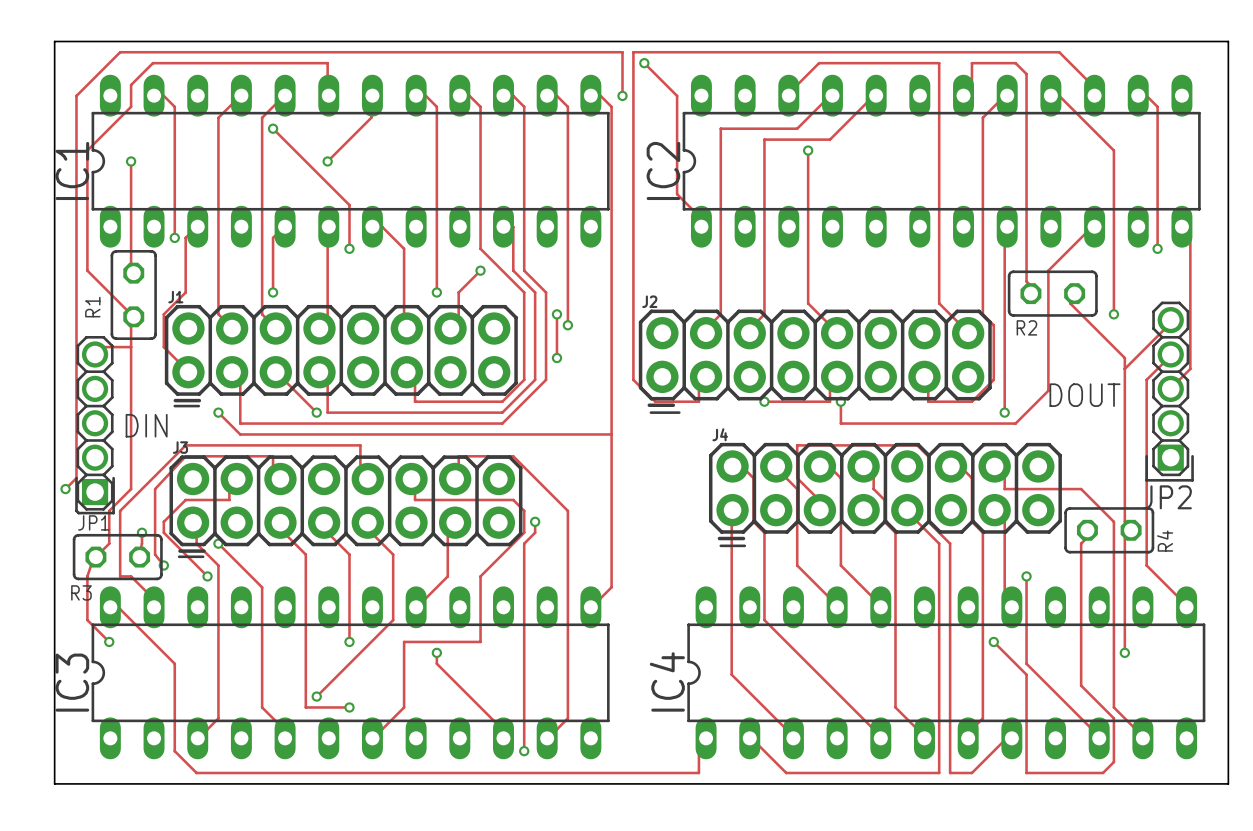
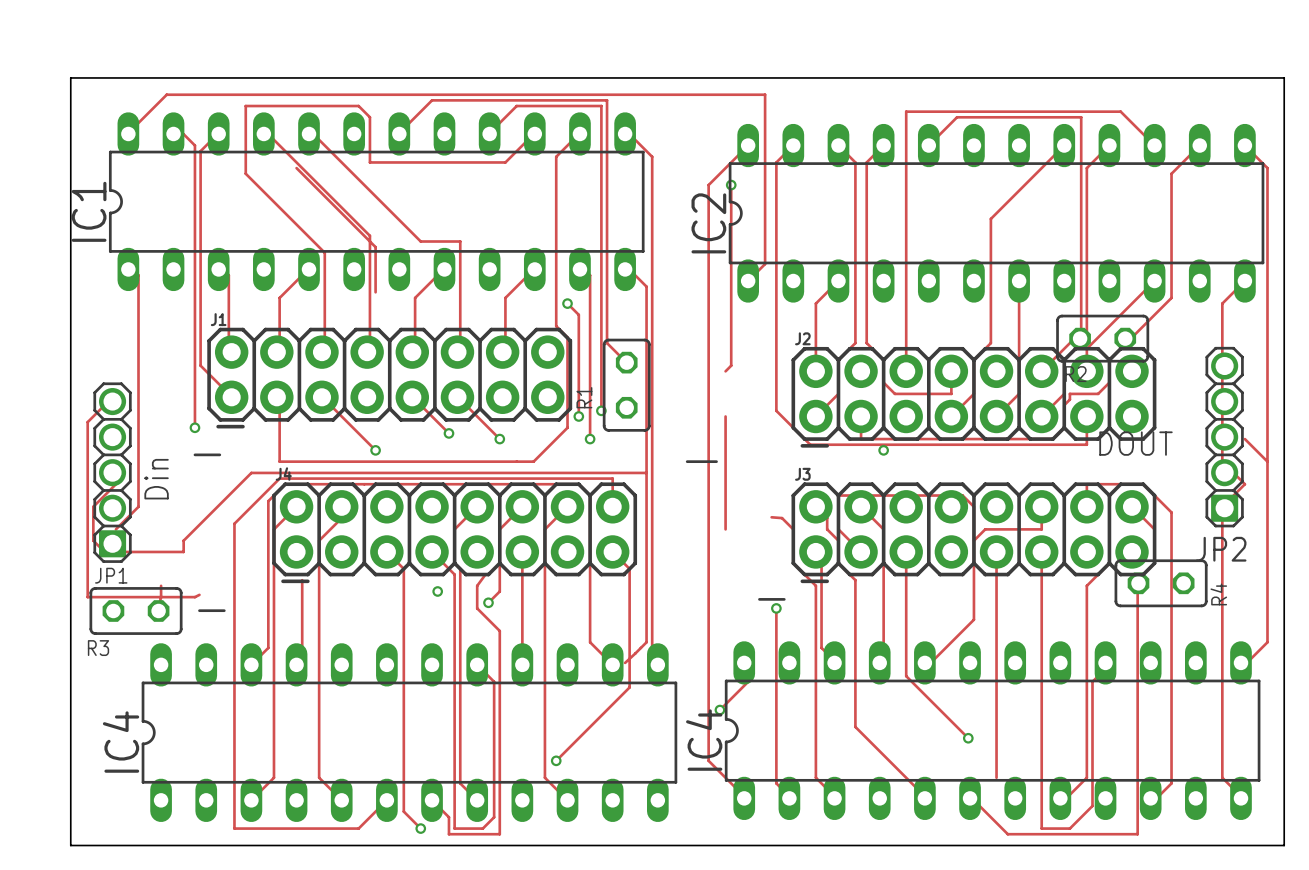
track: (644, 63) (677, 95) (677, 194) (698, 216) (701, 226) -> none
via: (644, 63) -> none
track: none -> (128, 133) (166, 94) (765, 94) (765, 264) (748, 281)
track: none -> (218, 133) (200, 151) (200, 365) (231, 397)
track: (241, 95) (218, 117) (218, 314) (232, 328) -> (263, 133) (268, 134) (369, 235) (369, 348) (367, 352)
track: (285, 95) (262, 117) (262, 314) (275, 328) -> (309, 133) (313, 134) (420, 241) (460, 241) (460, 348) (457, 352)
track: (328, 95) (327, 63) (152, 63) (131, 85) (131, 106) (87, 150) (87, 270) (131, 314) -> none
track: (372, 95) (371, 117) (327, 161) -> (399, 133) (432, 100) (607, 100) (607, 343) (626, 362)
track: (416, 95) (425, 95) (436, 106) (436, 292) -> none
track: (459, 95) (469, 95) (480, 106) (480, 248) (524, 292) (524, 379) (502, 401) (415, 401) (415, 379) (406, 372) -> none
track: (503, 95) (513, 95) (524, 106) (524, 117) -> (579, 133) (556, 156)
track: none -> (534, 133) (505, 162) (369, 162) (369, 117) (358, 106) (245, 106) (245, 173) (324, 252) (324, 348) (321, 352)
track: (547, 95) (556, 95) (567, 106) -> (489, 133) (516, 106) (601, 106) (601, 145)
track: (590, 95) (600, 95) (611, 106) (611, 243) -> (625, 269) (629, 269) (646, 286)
track: none -> (625, 133) (629, 134) (652, 156) (652, 659) (657, 664)
track: (622, 95) (622, 52) (120, 52) (76, 95) (76, 456) -> (115, 484) (93, 506)
via: (622, 95) -> none
track: (788, 95) (819, 63) (939, 63) (939, 303) (968, 333) -> none
track: (832, 95) (829, 95) (797, 128) (720, 128) (720, 314) (709, 325) (706, 333) -> none
track: (876, 95) (873, 95) (829, 139) (764, 139) (764, 314) (753, 325) (749, 333) -> none
track: (963, 95) (971, 85) (971, 63) (1015, 63) (1026, 74) (1026, 281) (1037, 292) (1030, 293) -> none
track: (1007, 95) (982, 117) (982, 314) (993, 325) (993, 379) (971, 401) (928, 401) (928, 379) (924, 376) -> none
track: (1050, 95) (1059, 95) (1113, 150) (1113, 314) -> none
track: (1094, 95) (1092, 85) (1059, 52) (633, 52) (633, 379) (655, 401) (698, 401) (698, 379) (706, 376) -> none
track: (1138, 95) (1146, 95) (1157, 106) (1157, 248) -> none
track: none -> (748, 145) (708, 185) (708, 760) (748, 800)
track: none -> (793, 145) (776, 162) (776, 410) (810, 444) (1086, 444) (1086, 416)
track: none -> (838, 145) (855, 162) (855, 343) (838, 360) (838, 393) (815, 416)
track: none -> (883, 145) (866, 162) (866, 343) (883, 360) (883, 382) (894, 393) (951, 393) (951, 371)
track: none -> (928, 145) (957, 117) (1081, 117) (1081, 331) (1041, 371)
track: none -> (1064, 145) (990, 218) (990, 343) (973, 360) (973, 393) (951, 416)
track: none -> (1109, 145) (1086, 168) (1086, 337) (1064, 360) (1064, 393) (1041, 416)
track: none -> (1154, 145) (1120, 111) (906, 111) (906, 371)
track: none -> (1199, 145) (1171, 173) (1171, 297) (1109, 360) (1109, 382) (1098, 393) (1069, 393) (1069, 399) (1064, 405) (1064, 427) (1052, 439) (861, 439) (861, 416)
track: none -> (1244, 145) (1267, 168) (1267, 642) (1244, 664)
via: (273, 128) -> none
track: none -> (731, 185) (731, 365) (725, 371)
via: none -> (731, 185)
track: (808, 150) (808, 303) (837, 333) -> none
via: (808, 150) -> none
track: (131, 161) (131, 281) (133, 273) -> none
via: (131, 161) -> none
via: (327, 161) -> none
IC2 position: (941, 161) -> (996, 213)
track: none -> (128, 269) (132, 269) (138, 275) (138, 506) (115, 529)
track: (197, 226) (185, 237) (185, 292) (163, 314) (163, 347) (188, 372) -> (218, 269) (223, 269) (228, 275) (228, 348) (231, 352)
track: (328, 226) (327, 325) (319, 328) -> none
track: (372, 226) (382, 226) (404, 248) (404, 325) (406, 328) -> none
track: none -> (444, 269) (415, 297) (415, 348) (412, 352)
track: (503, 226) (513, 226) (513, 270) (524, 281) -> (556, 314) (556, 326)
track: none -> (534, 269) (505, 297) (505, 348) (502, 352)
track: none -> (579, 269) (584, 269) (590, 275) (590, 360)
track: (1007, 226) (1004, 226) (1004, 412) -> none
track: (1094, 226) (1092, 226) (1048, 270) (1048, 390) (1015, 423) (840, 423) (840, 401) -> none
track: (1181, 226) (1190, 226) (1190, 368) (1170, 388) -> none
track: none -> (194, 281) (194, 427)
via: (174, 237) -> none
track: (273, 237) (273, 292) -> (296, 281) (279, 297) (279, 348) (276, 352)
track: none -> (838, 281) (815, 303) (815, 371)
track: none -> (1019, 281) (1019, 393) (996, 416)
track: none -> (1154, 281) (1086, 348) (1086, 371)
track: none -> (1244, 281) (1222, 303) (1222, 461) (1244, 484) (1222, 506) (1222, 777) (1244, 800)
via: (349, 248) -> none
via: (1157, 248) -> none
track: none -> (567, 303) (578, 314) (578, 416)
via: none -> (567, 303)
track: (480, 270) (458, 292) (458, 325) (450, 328) -> none
via: (480, 270) -> none
track: (524, 270) (546, 292) (546, 379) (502, 423) -> (646, 472) (533, 472)
via: (273, 292) -> none
via: (436, 292) -> none
track: (1074, 293) (1070, 303) (1124, 358) (1124, 521) (1131, 530) (1124, 532) (1124, 652) -> none
R1 position: (133, 294) -> (626, 385)
track: (131, 314) (131, 489) (109, 510) (109, 543) (95, 557) (87, 576) (87, 620) (109, 641) -> none
via: (556, 314) -> none
via: (1113, 314) -> none
track: (1170, 320) (1168, 325) (1124, 368) -> none
via: (567, 325) -> none
track: none -> (115, 393) (87, 422) (87, 597) (194, 597) (199, 594)
track: (131, 347) (98, 347) (95, 354) -> none
track: none -> (321, 397) (375, 450)
track: none -> (412, 397) (448, 433)
track: none -> (457, 397) (499, 439)
J1 position: (341, 353) -> (389, 378)
track: (1170, 354) (1146, 379) (1146, 565) (1186, 607) -> none
track: none -> (590, 405) (590, 439)
via: (556, 358) -> none
J2 position: (815, 358) -> (973, 397)
via: none -> (601, 410)
via: none -> (578, 416)
track: none -> (725, 416) (725, 529)
track: (232, 372) (240, 379) (240, 423) -> none
track: (275, 372) (316, 412) -> none
track: (319, 372) (327, 379) (327, 412) -> (276, 397) (279, 399) (279, 461) (353, 461)
track: (837, 376) (829, 379) (829, 401) (764, 401) -> none
via: none -> (448, 433)
via: none -> (499, 439)
via: none -> (590, 439)
track: none -> (1244, 439) (1267, 461)
via: (764, 401) -> none
track: (218, 412) (240, 434) (262, 434) -> (251, 664) (268, 647) (268, 501) (285, 484)
via position: (218, 412) -> (194, 427)
via position: (316, 412) -> (375, 450)
via: (1004, 412) -> none
text: DIN (146, 425) -> none
text: none -> Din (156, 479)
track: (546, 434) (611, 434) -> (578, 484) (590, 495) (590, 642) (612, 664)
track: none -> (296, 506) (273, 529) (273, 777) (251, 800)
track: none -> (341, 506) (341, 518) (319, 540) (319, 777) (341, 800)
track: none -> (477, 506) (454, 529) (454, 563) (460, 568) (460, 783) (477, 800)
track: none -> (522, 506) (499, 529) (499, 591) (488, 602)
track: none -> (567, 506) (544, 529) (544, 777) (567, 800)
track: none -> (612, 506) (612, 478) (279, 478) (234, 523) (234, 828) (358, 828) (386, 800)
track: none -> (1041, 506) (1041, 529) (985, 529) (973, 540)
track: none -> (1086, 506) (1086, 484) (1143, 484) (1171, 512) (1171, 783) (1154, 800)
line: (1146, 456) (1146, 480) (1192, 480) (1192, 456) -> none
track: (863, 466) (873, 467) (873, 489) (884, 499) (884, 521) (895, 532) (895, 707) (924, 738) -> none
track: (950, 466) (961, 467) (971, 478) (971, 521) (982, 532) (982, 718) (971, 729) (968, 738) -> none
track: (994, 466) (1004, 467) (1004, 489) (1081, 489) (1113, 521) (1113, 707) (1142, 738) -> none
line: (76, 478) (76, 510) (78, 513) (113, 513) (113, 478) -> none
track: (76, 478) (65, 489) -> (93, 529) (93, 540) (104, 551) (183, 551) (183, 540) (251, 472) (262, 472)
track: (236, 479) (229, 489) (229, 499) (185, 499) (163, 521) (163, 532) (207, 576) -> none
track: (280, 479) (273, 478) (273, 456) (185, 456) (155, 489) (155, 554) (163, 565) -> none
track: (367, 479) (360, 478) (360, 445) (185, 445) (120, 510) (120, 576) (131, 576) (152, 598) (154, 607) -> none
track: (411, 479) (415, 489) (415, 499) (513, 499) (524, 510) (524, 532) (480, 576) (480, 641) (404, 641) (404, 707) (372, 738) -> none
track: (455, 479) (458, 478) (458, 456) (513, 456) (567, 510) (567, 718) (547, 738) -> none
track: none -> (1109, 535) (1109, 563) (1086, 585) (1086, 777) (1064, 800)
via: (65, 489) -> none
J4 position: (885, 491) -> (454, 532)
track: none -> (386, 551) (403, 568) (403, 811) (420, 828)
track: none -> (432, 551) (454, 574) (454, 828) (482, 828) (494, 817) (494, 681) (477, 664)
track: none -> (522, 551) (522, 664)
track: none -> (612, 551) (629, 568) (629, 687) (556, 760)
track: none -> (815, 551) (821, 557) (821, 647) (838, 664)
track: none -> (906, 551) (906, 676) (968, 738)
track: none -> (1041, 551) (1041, 828) (1069, 828) (1092, 805) (1092, 681) (1109, 664)
J3 position: (345, 504) -> (973, 532)
track: (732, 510) (731, 674) (775, 718) -> (793, 563) (815, 585) (815, 777)
track: (753, 510) (753, 521) (764, 532) (764, 620) (813, 669) -> (838, 563) (855, 580) (855, 726)
track: (797, 510) (797, 565) (837, 607) -> none
track: (907, 510) (917, 510) (917, 521) (939, 543) (939, 772) (786, 772) (749, 738) -> none
track: (994, 510) (1004, 510) (1004, 598) (1011, 607) -> none
track: (535, 521) (535, 532) (524, 543) (524, 751) -> none
via: (535, 521) -> none
track: (928, 521) (950, 543) -> (996, 551) (996, 597)
track: none -> (973, 574) (973, 619) (928, 664)
track: (193, 522) (196, 532) (196, 543) (218, 565) (218, 718) (197, 738) -> none
track: (280, 522) (283, 532) (305, 554) (305, 707) (349, 707) -> none
track: (324, 522) (327, 532) (349, 554) (349, 641) -> none
track: (367, 522) (371, 532) (393, 554) (393, 620) (316, 696) -> none
track: none -> (302, 580) (302, 659) (296, 664)
track: (1087, 530) (1092, 532) (1081, 543) (1081, 685) (1113, 718) (1113, 762) (1102, 772) (1086, 772) -> (1132, 506) (1154, 529) (1154, 563) (1137, 580) (1137, 834)
via: (142, 532) -> none
via: none -> (437, 591)
track: (218, 543) (262, 587) (262, 707) (283, 729) (285, 738) -> none
via: (218, 543) -> none
via: none -> (488, 602)
track: (447, 554) (447, 576) (416, 607) -> (477, 608) (499, 631) (499, 834)
track: none -> (776, 608) (776, 783) (793, 800)
via: none -> (776, 608)
via: (163, 565) -> none
track: (840, 565) (880, 607) -> (883, 619) (883, 664)
via: (207, 576) -> none
track: (1026, 576) (1026, 663) (1099, 738) -> none
via: (1026, 576) -> none
track: (110, 607) (120, 609) (174, 663) (174, 751) (196, 772) (420, 772) -> (432, 800) (448, 817) (448, 834)
track: none -> (748, 664) (748, 681) (719, 710)
via: (109, 641) -> none
via: (349, 641) -> none
track: (993, 641) (1026, 674) (1026, 772) -> none
via: (993, 641) -> none
track: (436, 652) (436, 663) (502, 729) (503, 738) -> none
via: (436, 652) -> none
via: none -> (719, 710)
via: (1124, 652) -> none
IC3: (350, 672) -> none
IC4: none -> (409, 732)
via: none -> (968, 738)
via: (316, 696) -> none
via: (349, 707) -> none
track: (950, 718) (950, 772) (961, 772) -> (973, 800) (1007, 834)
track: (706, 738) (698, 740) (698, 772) (469, 772) -> none
track: (1011, 738) (1004, 740) (971, 772) -> (1075, 834) (1019, 834)
via position: (524, 751) -> (556, 760)
via: none -> (420, 828)

